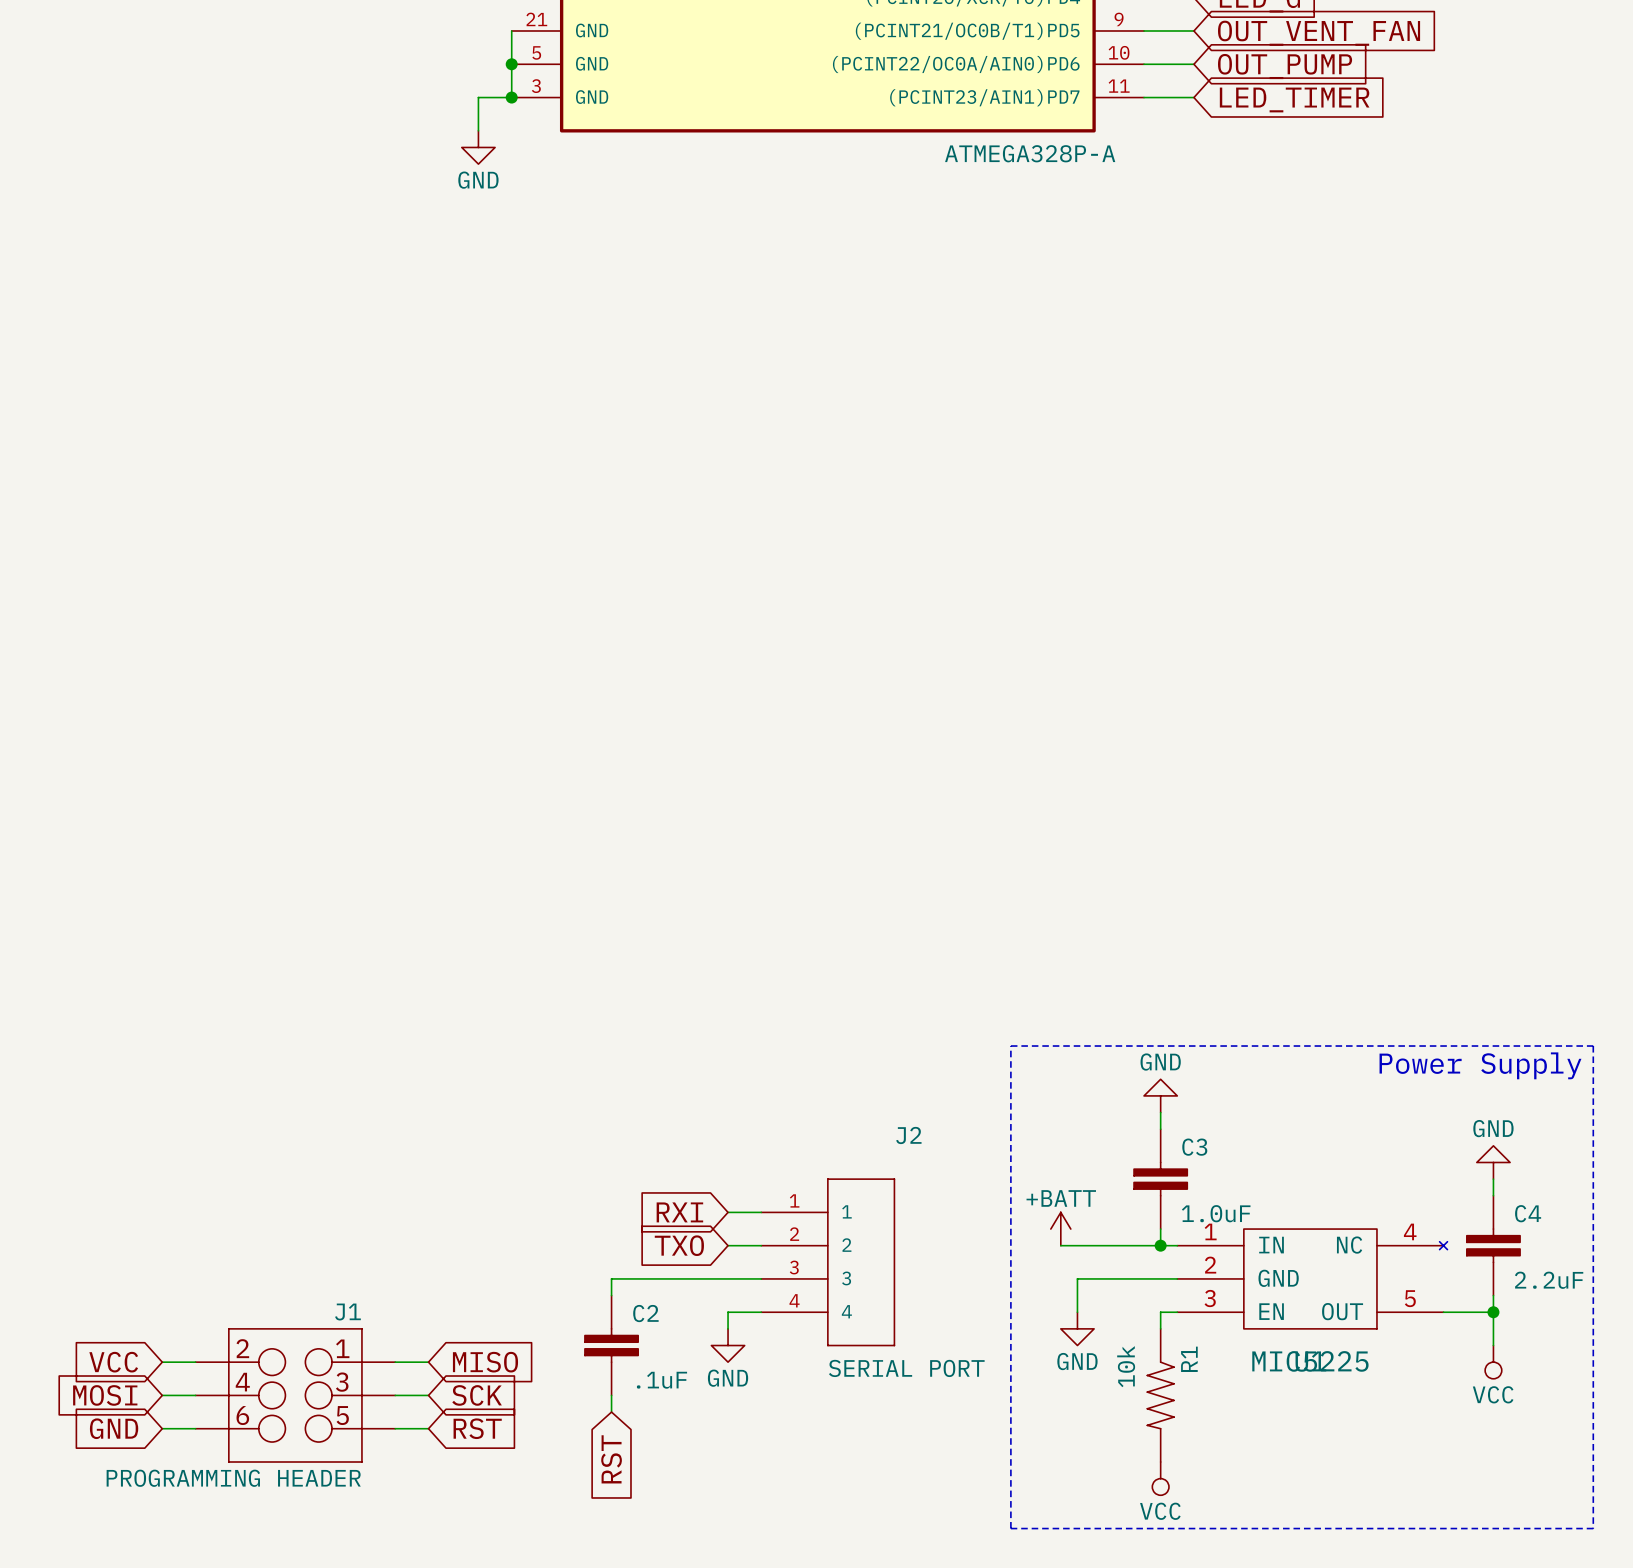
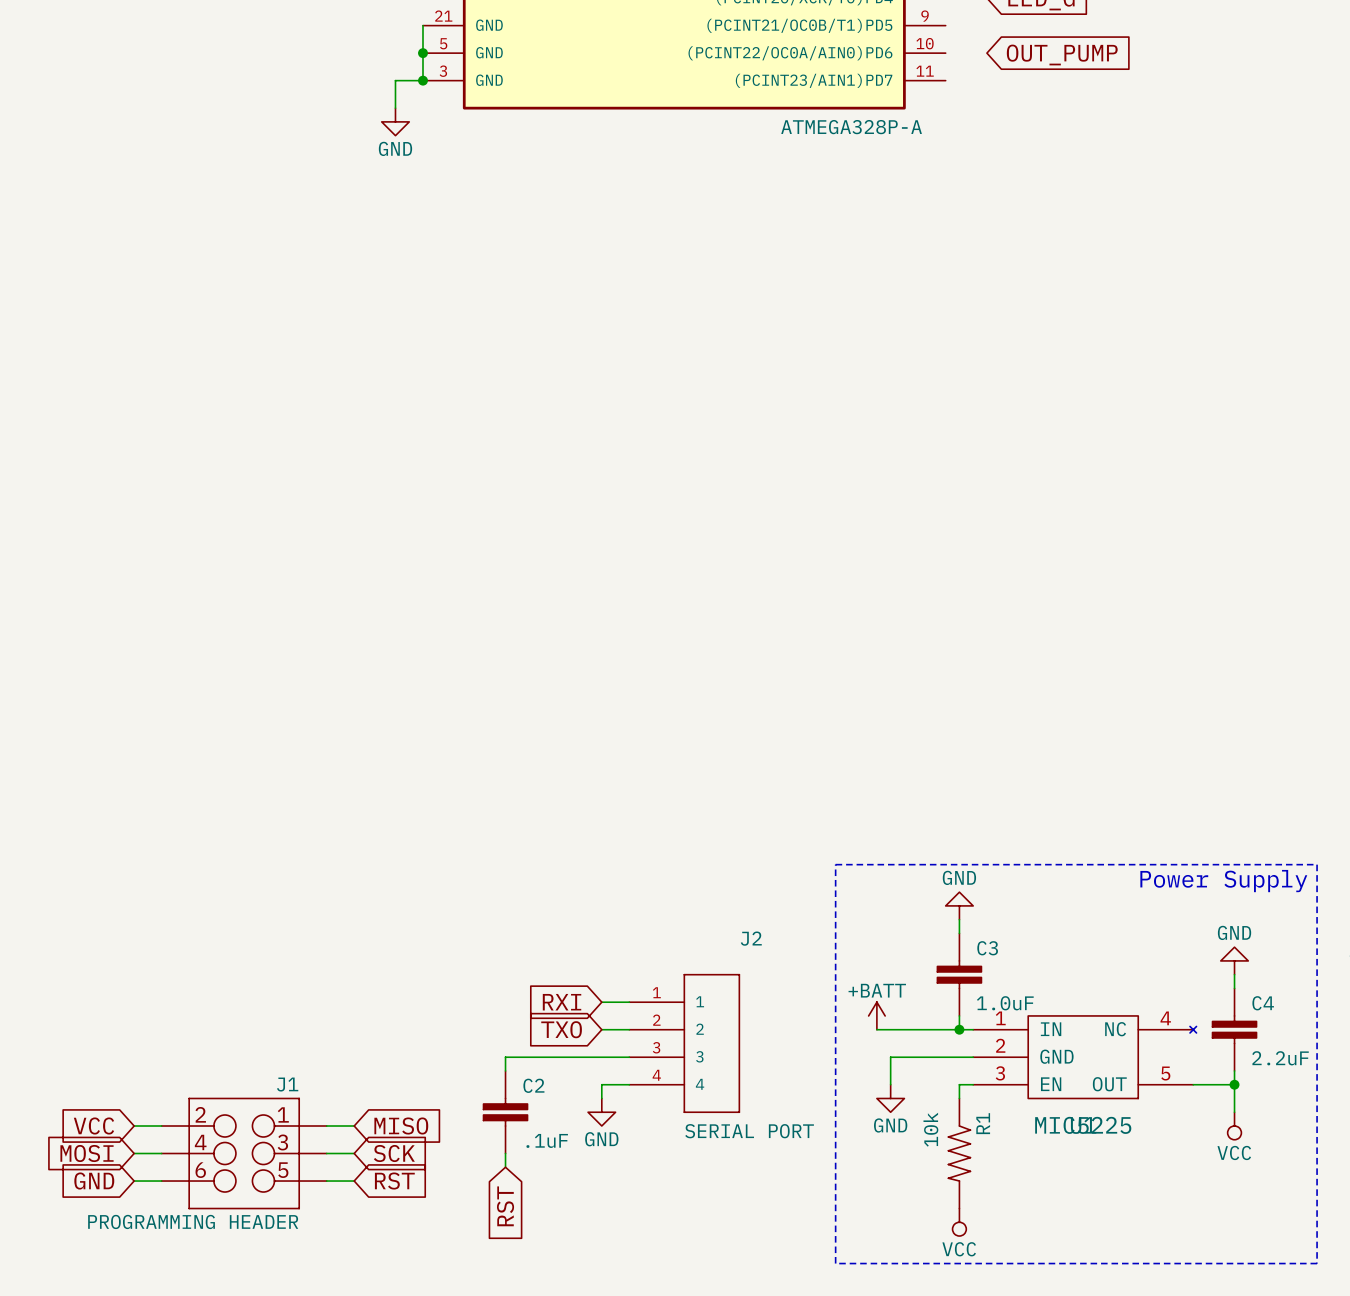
wire: (1144, 30) (1193, 30) -> none
global label: OUT_VENT_FAN (1319, 33) -> none
wire: (1144, 64) (1193, 64) -> none
wire: (1144, 97) (1193, 97) -> none
global label: LED_TIMER (1294, 99) -> none

